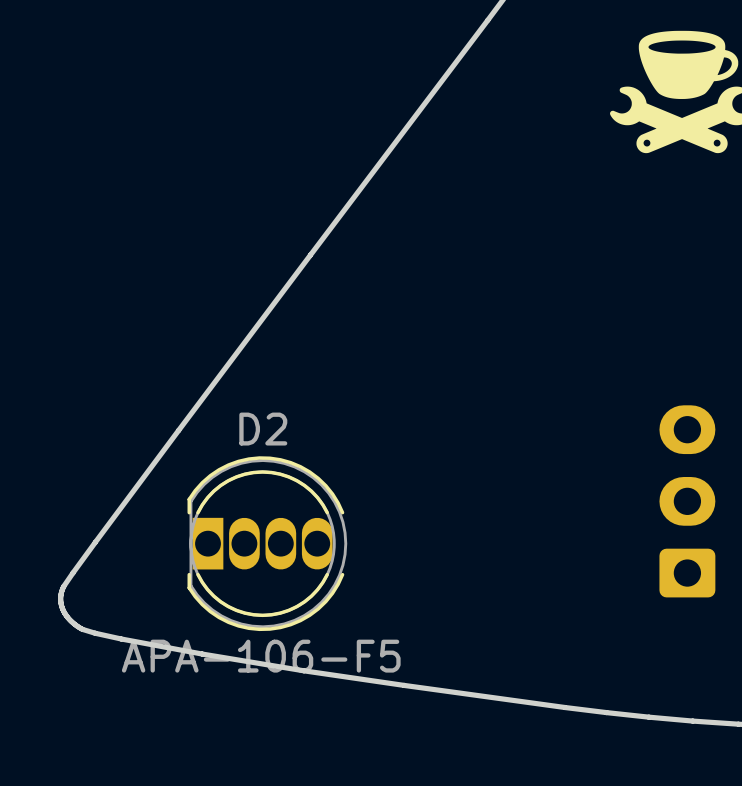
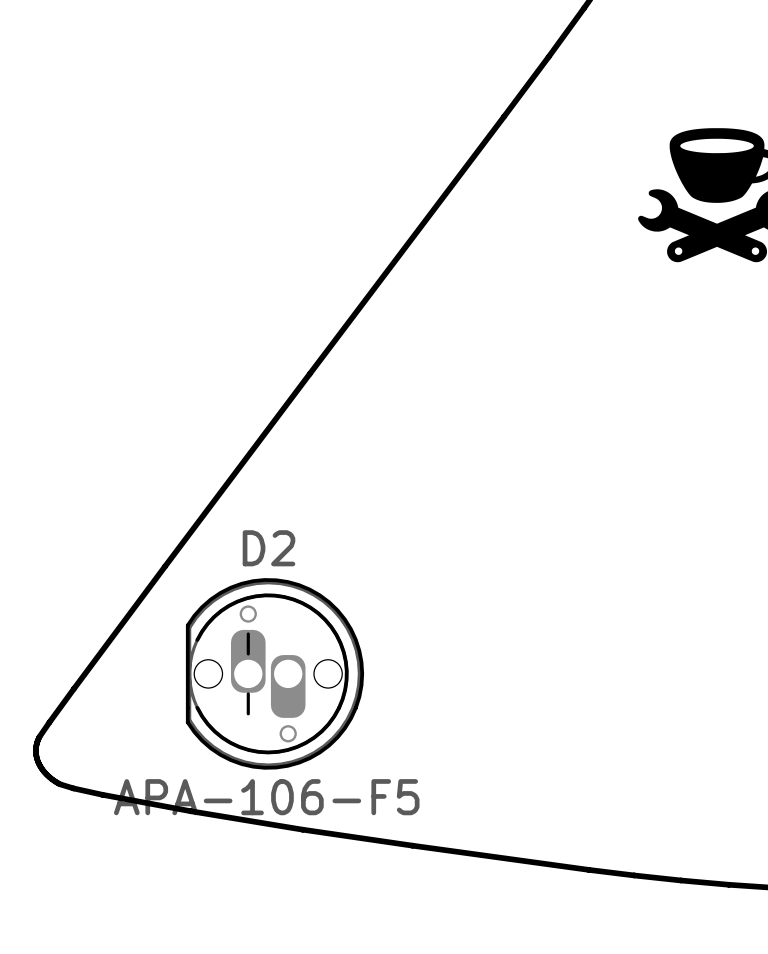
D2 footprint: [187, 456, 348, 632] -> [185, 578, 365, 770]
part: (687, 501) -> none

